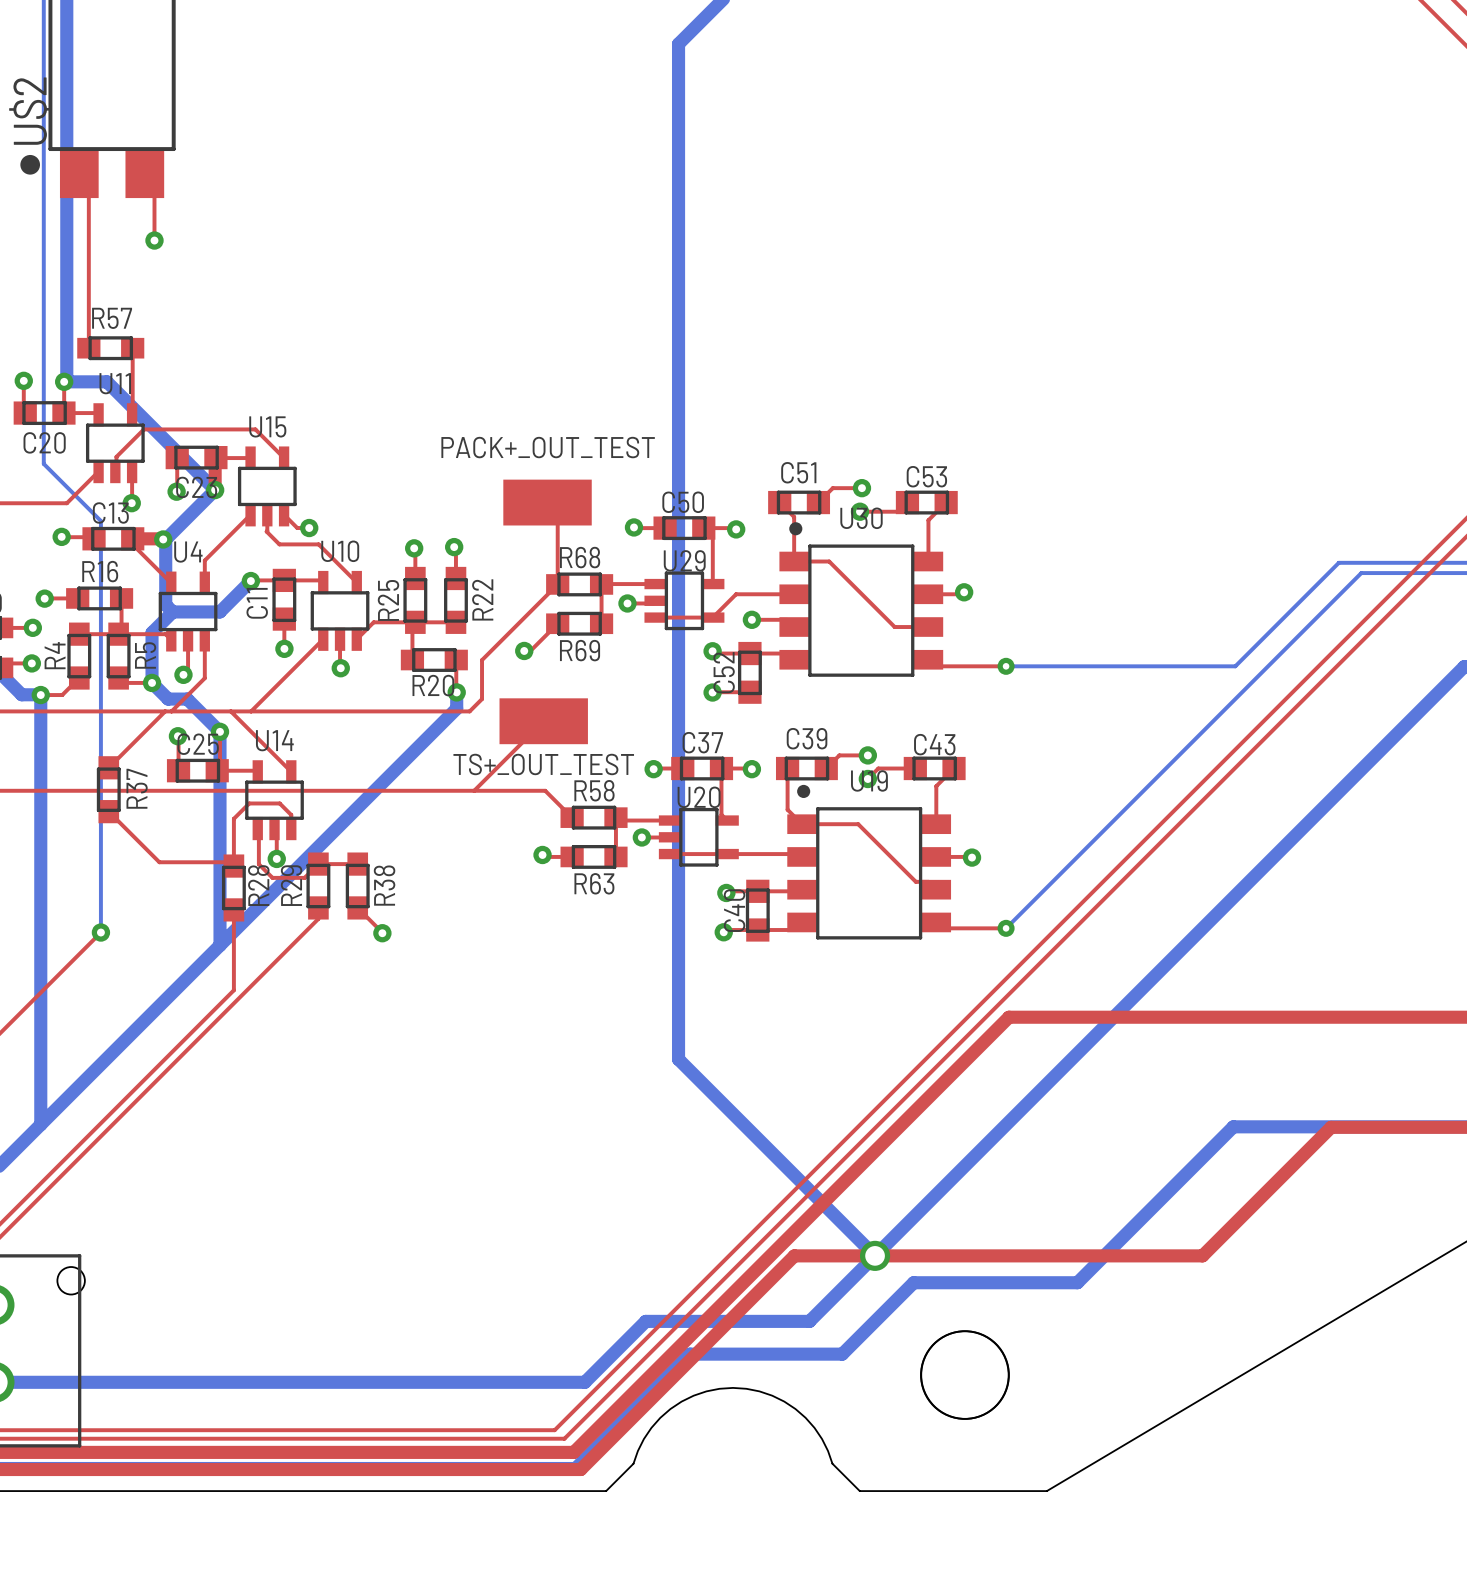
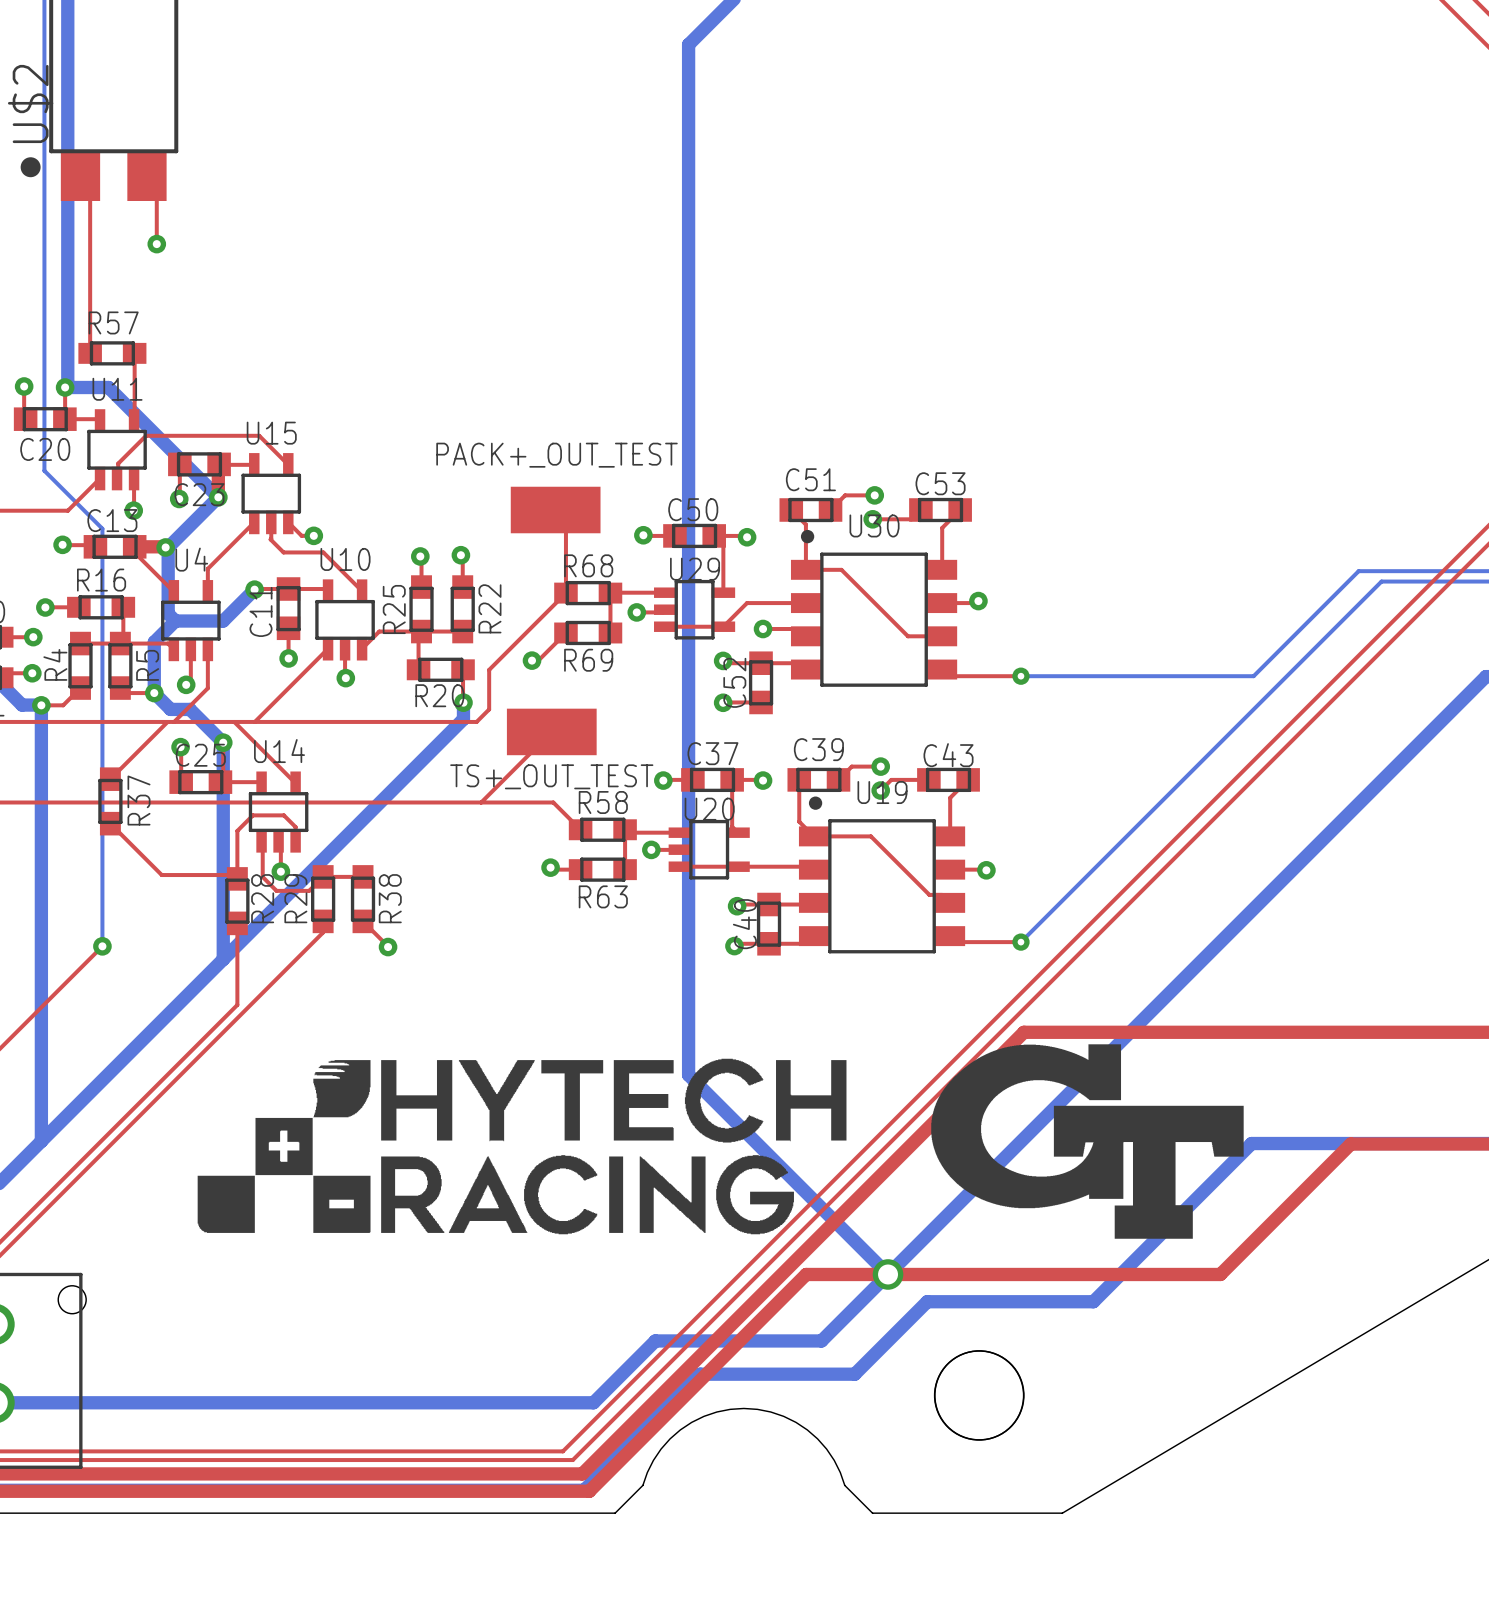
drawing: none -> [931, 1044, 1244, 1239]
drawing: none -> [197, 1058, 847, 1235]

